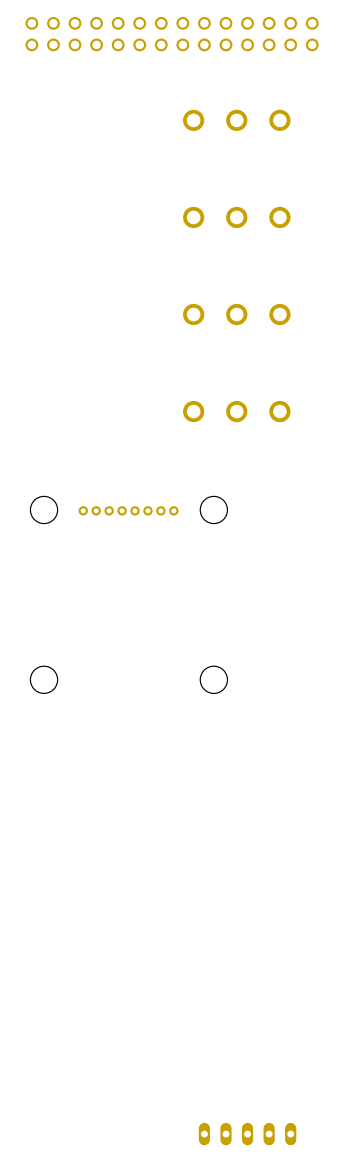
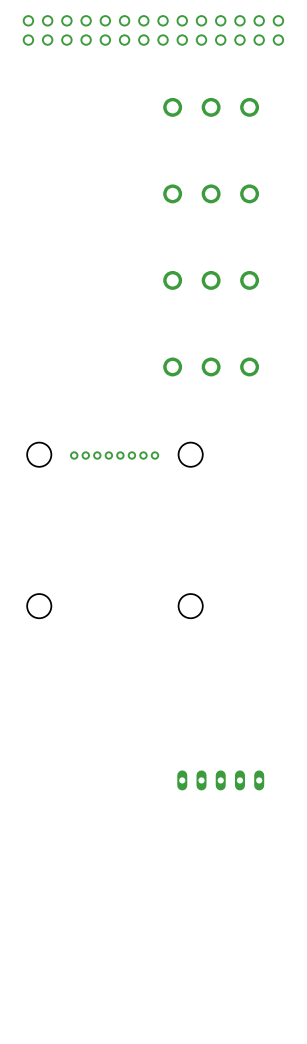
part: none -> (220, 780)
part: (247, 1134) -> none

